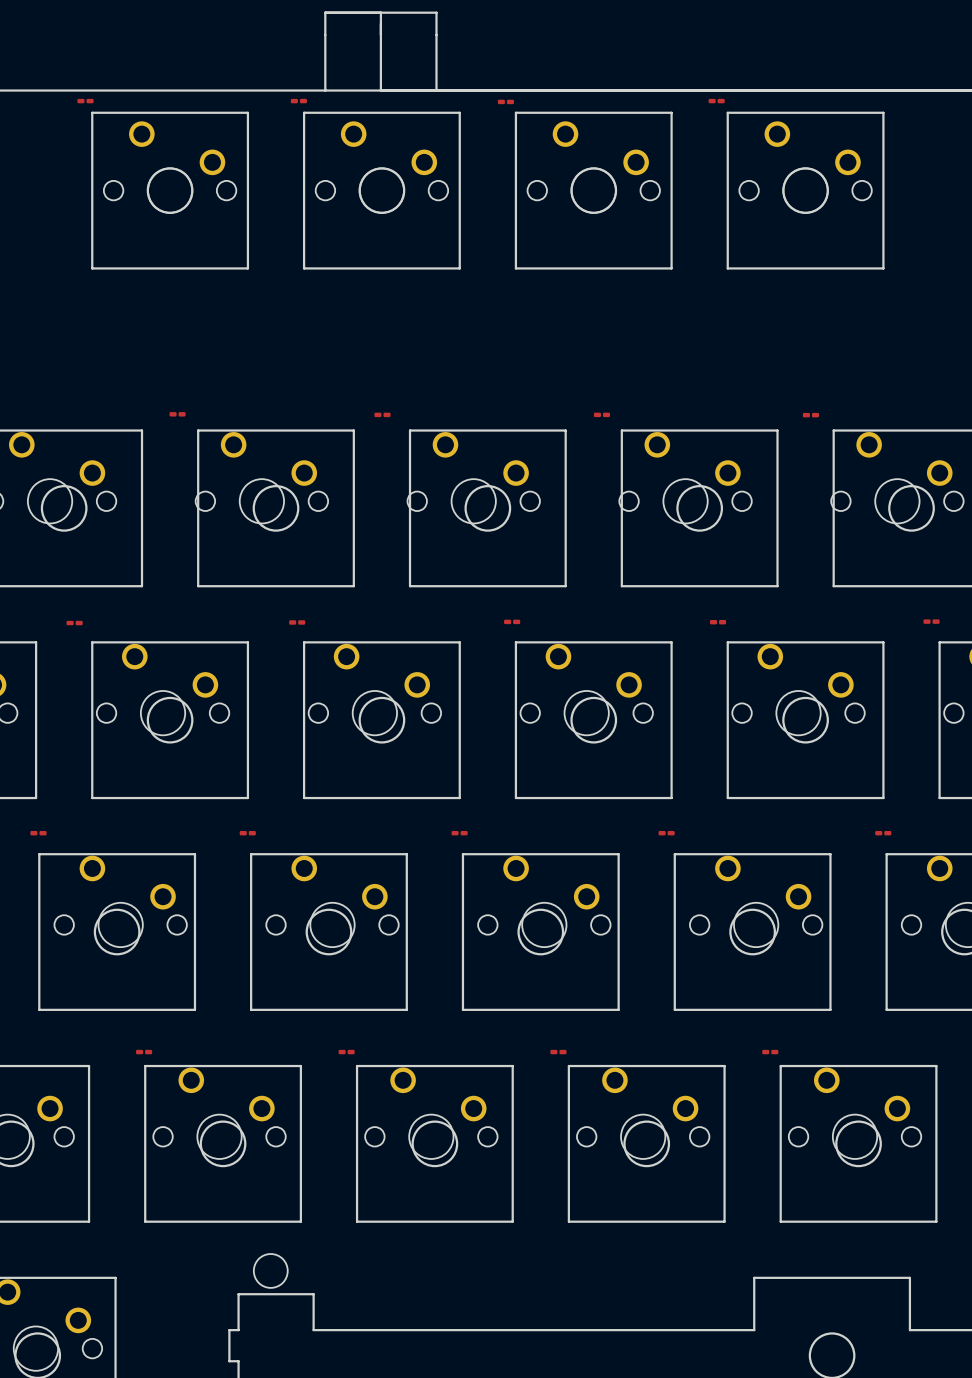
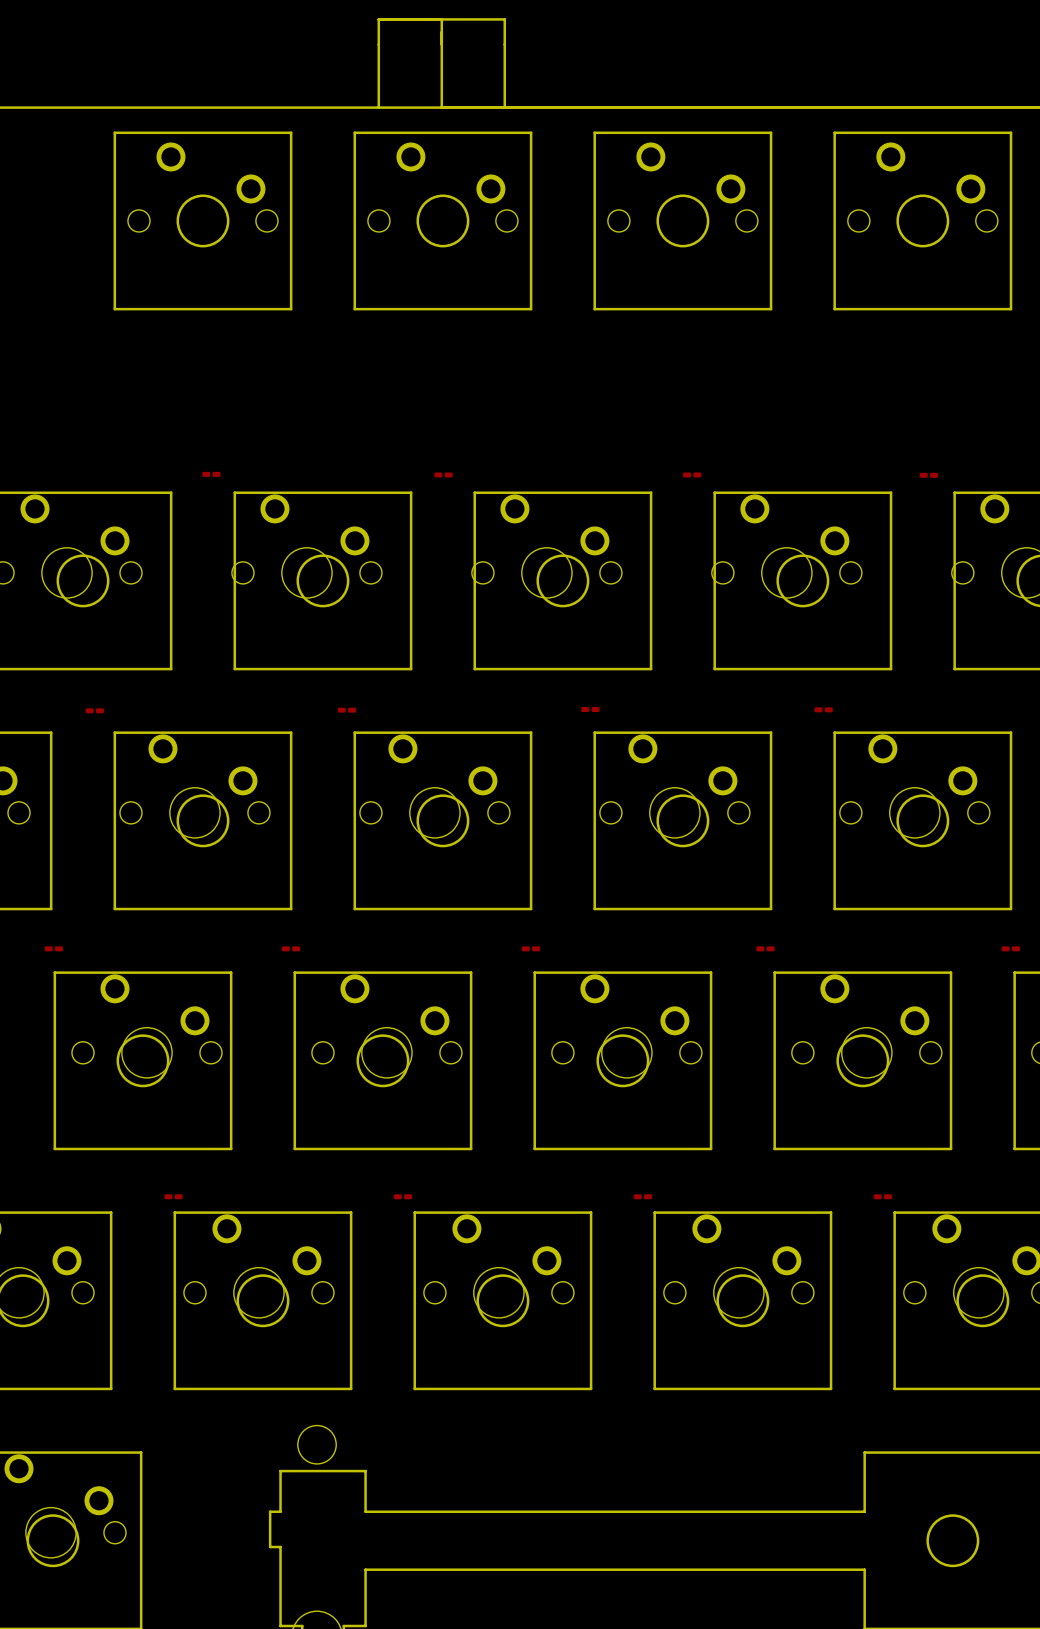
part: (85, 101) -> none
part: (298, 101) -> none
part: (505, 101) -> none
part: (716, 101) -> none

